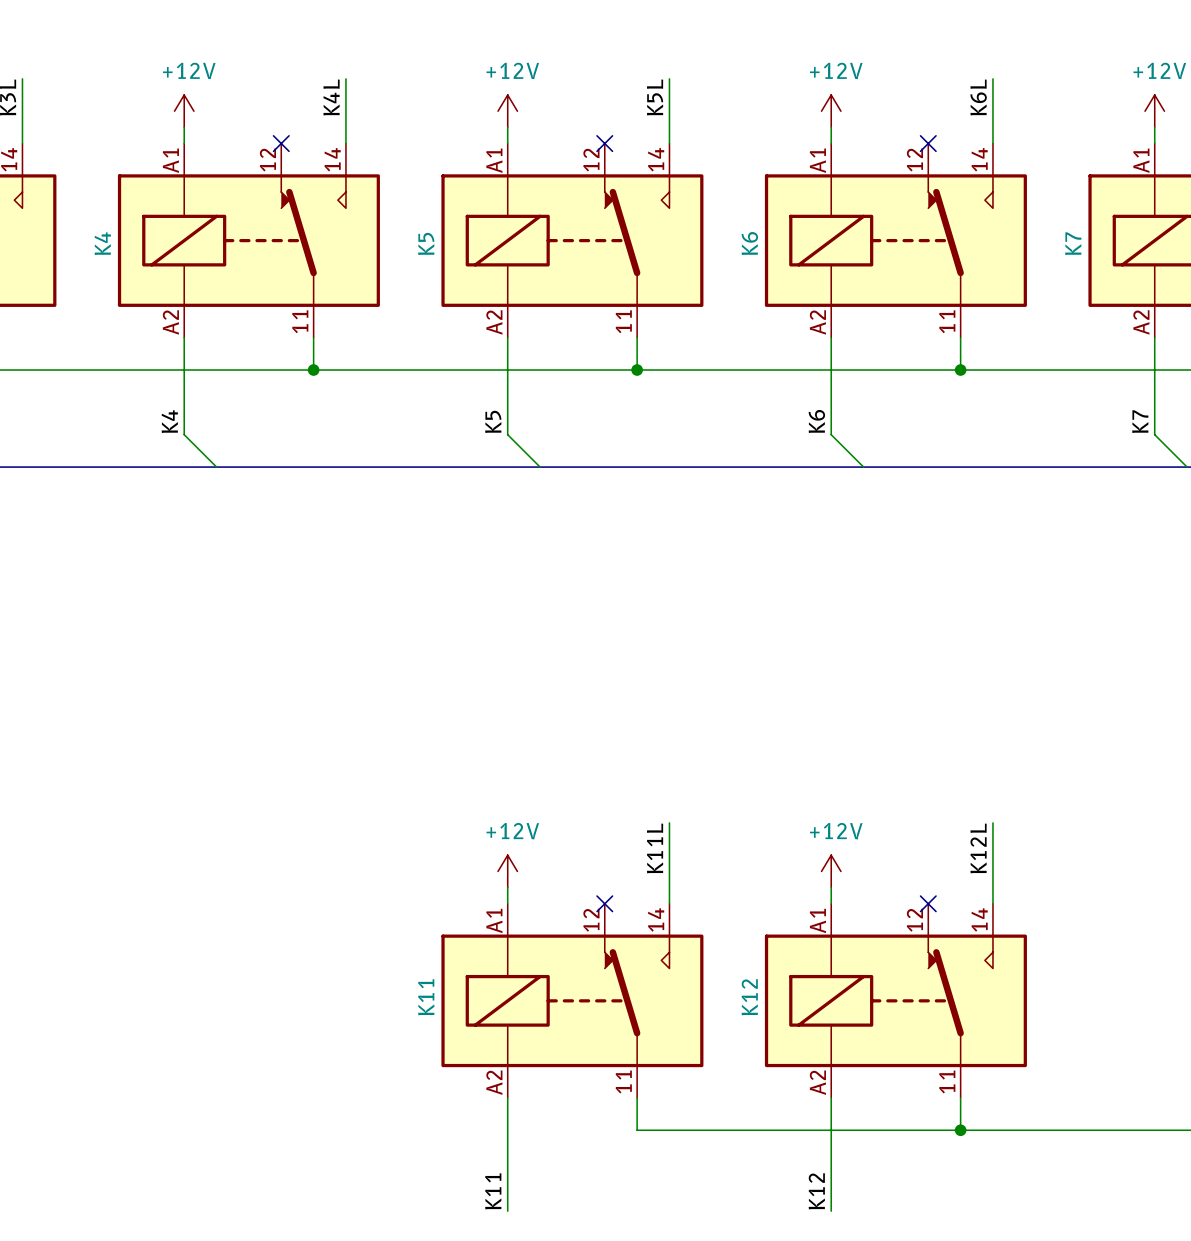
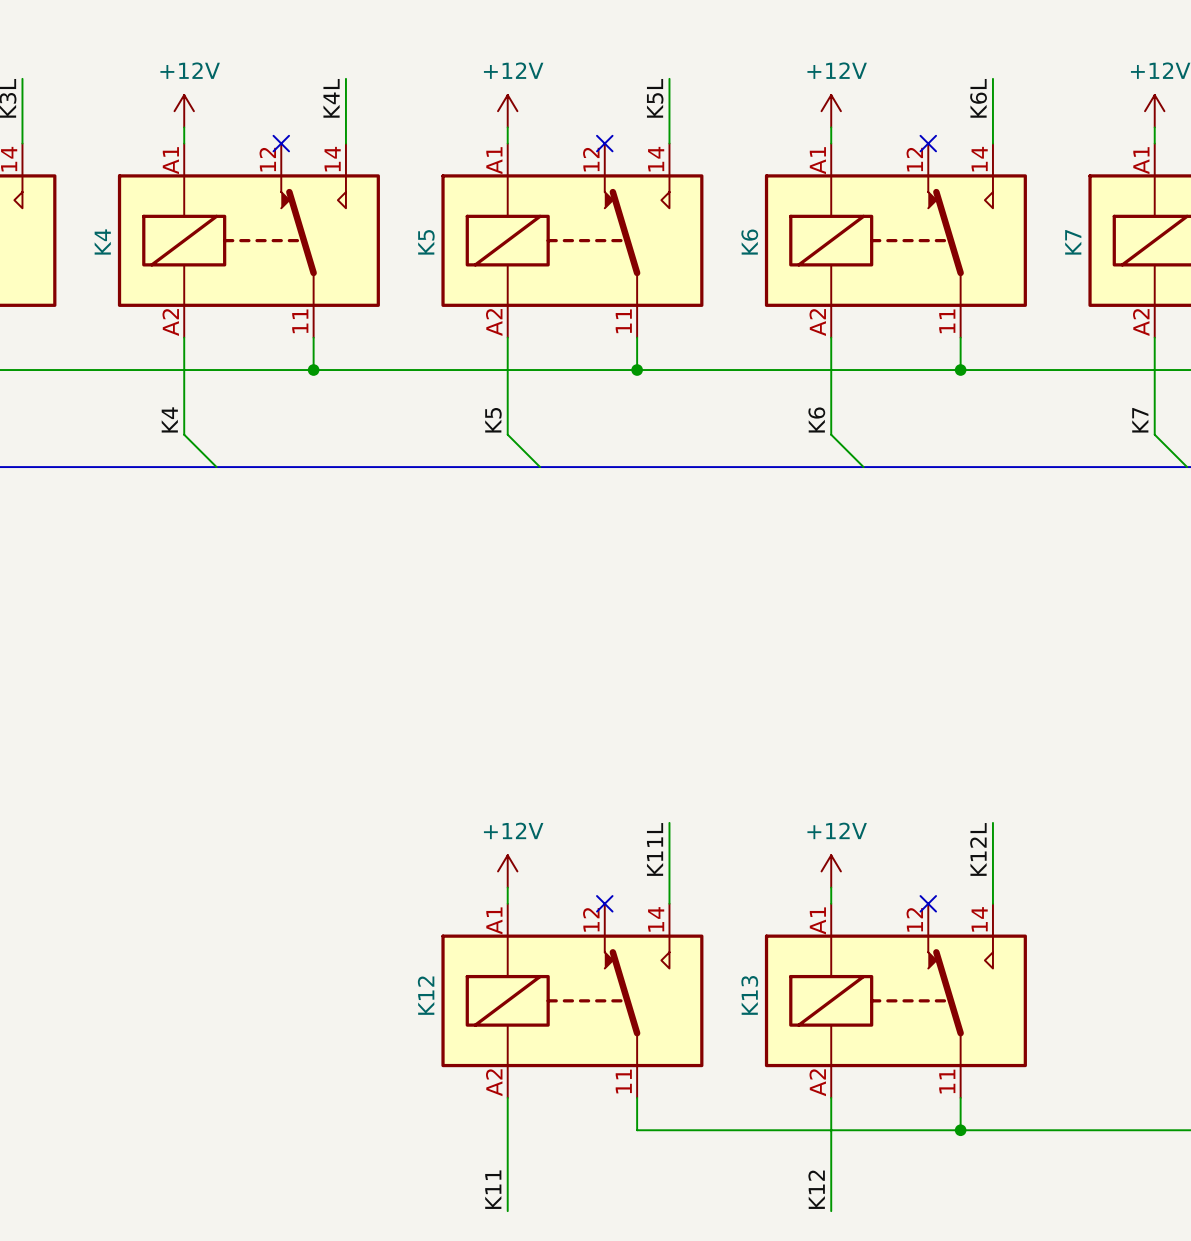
K11 name: K11 (426, 997) -> K12 (426, 995)
K12 name: K12 (749, 997) -> K13 (749, 995)

